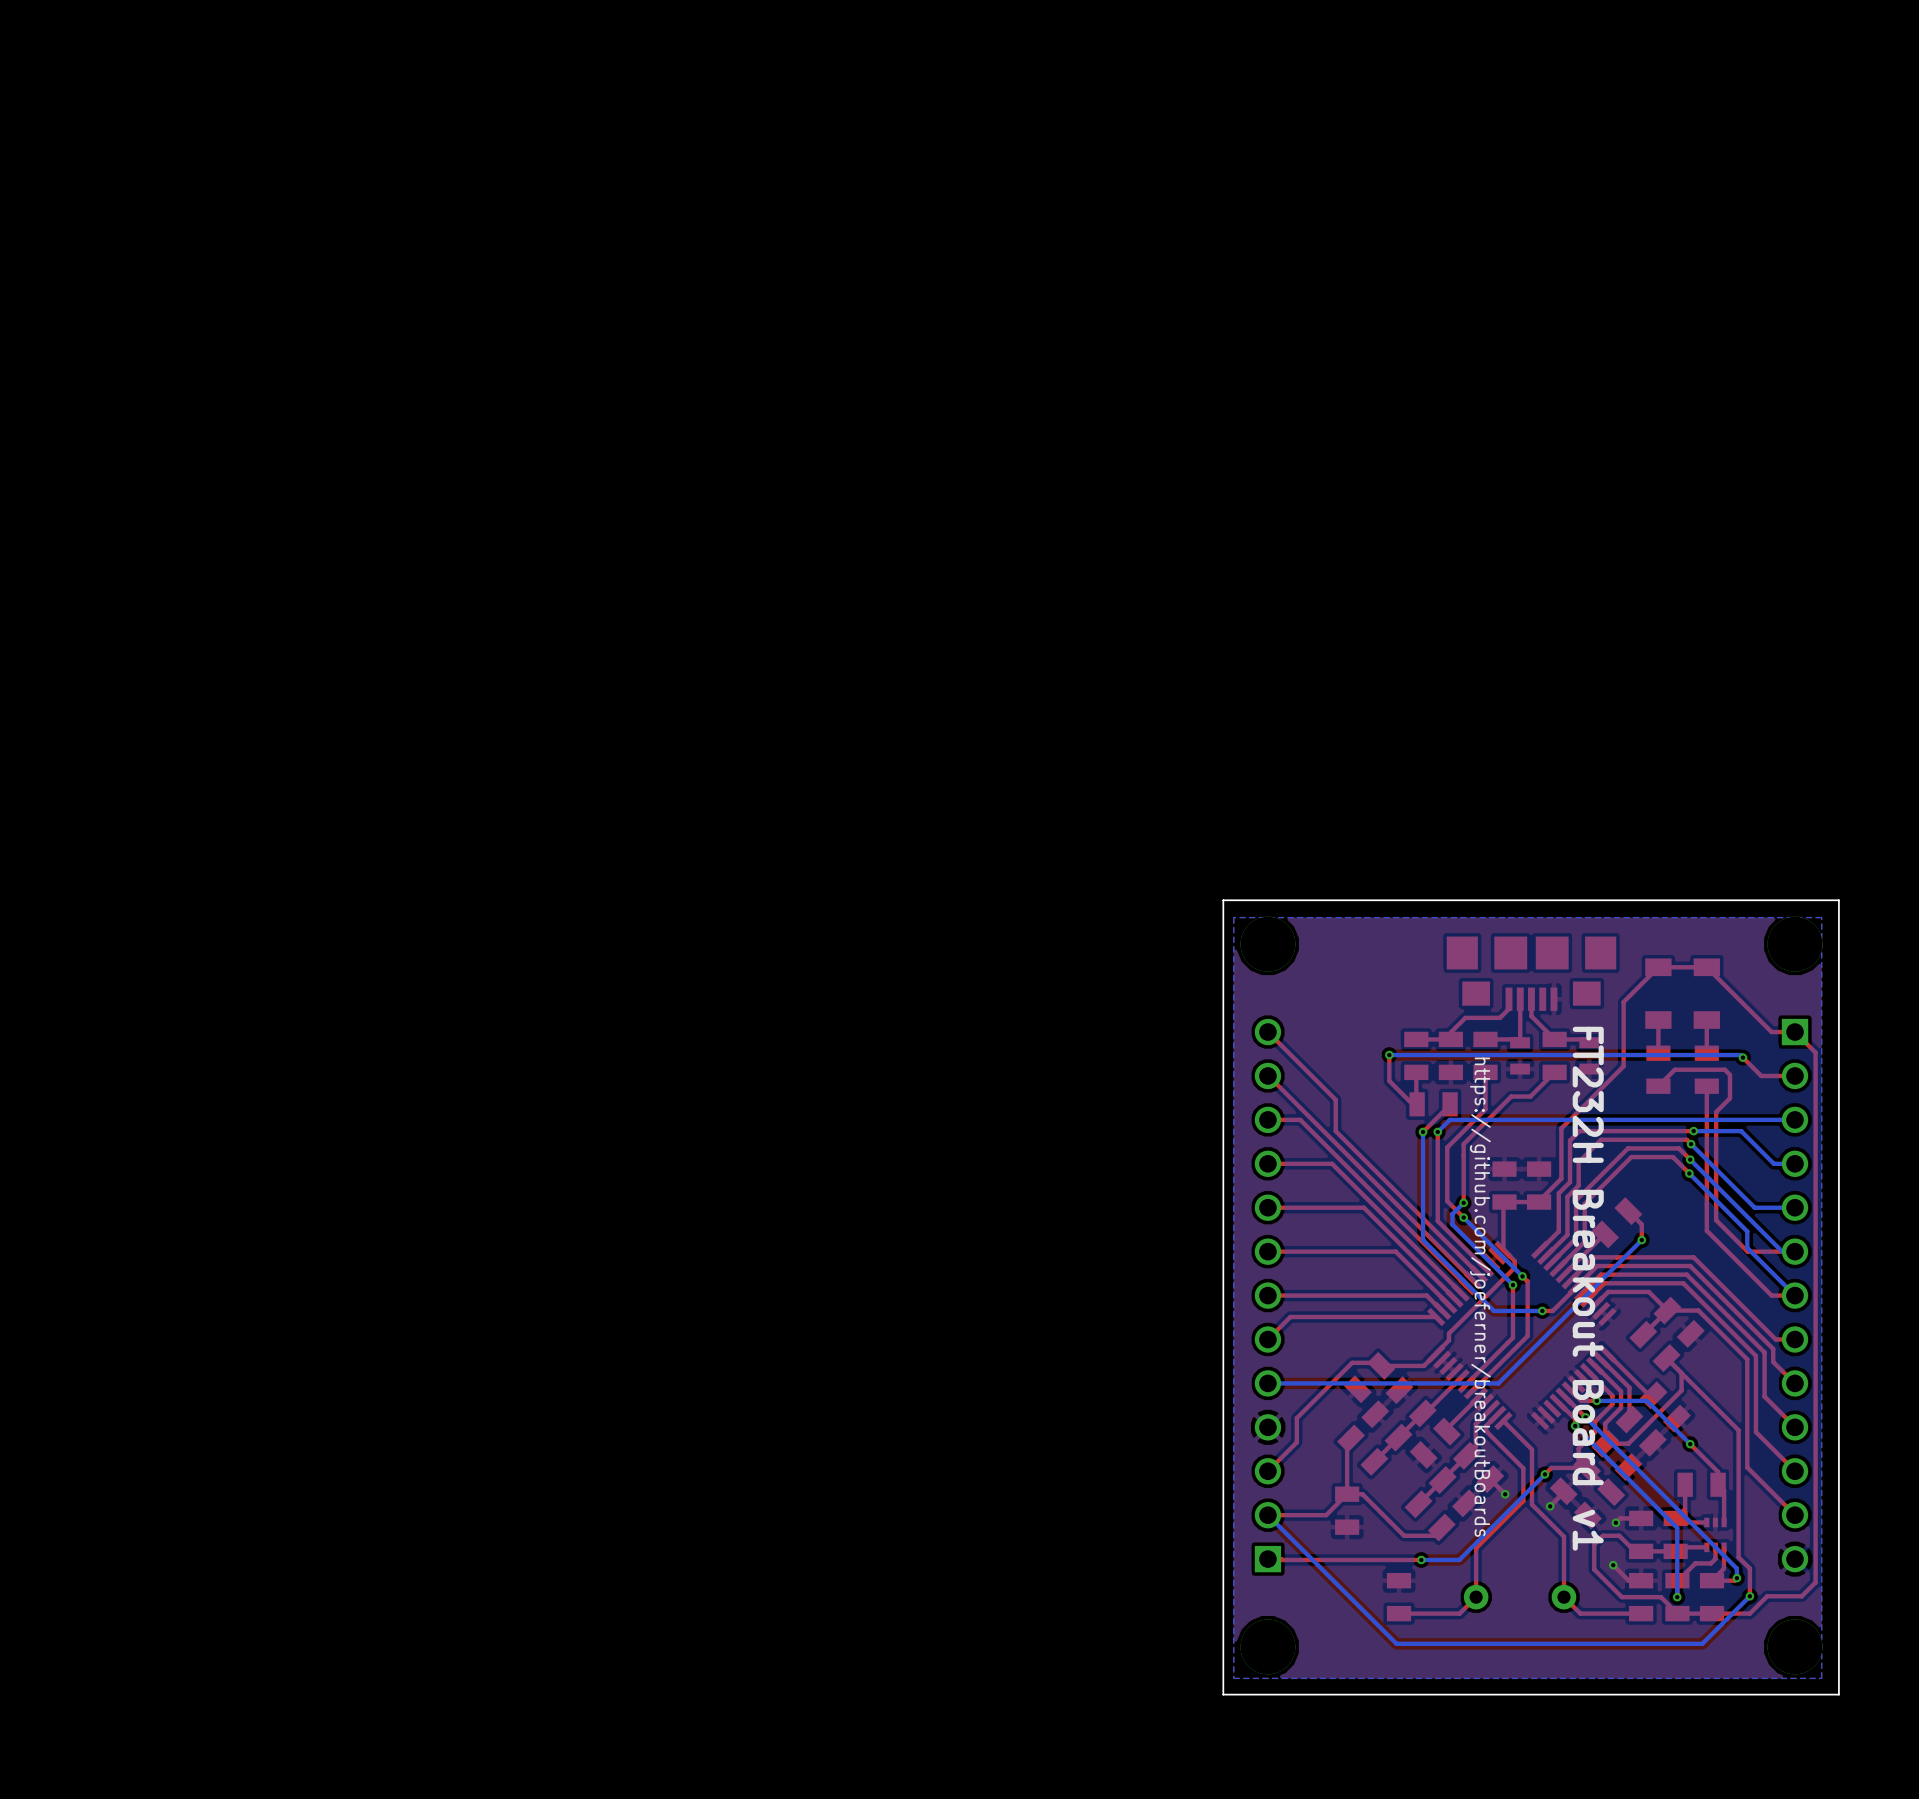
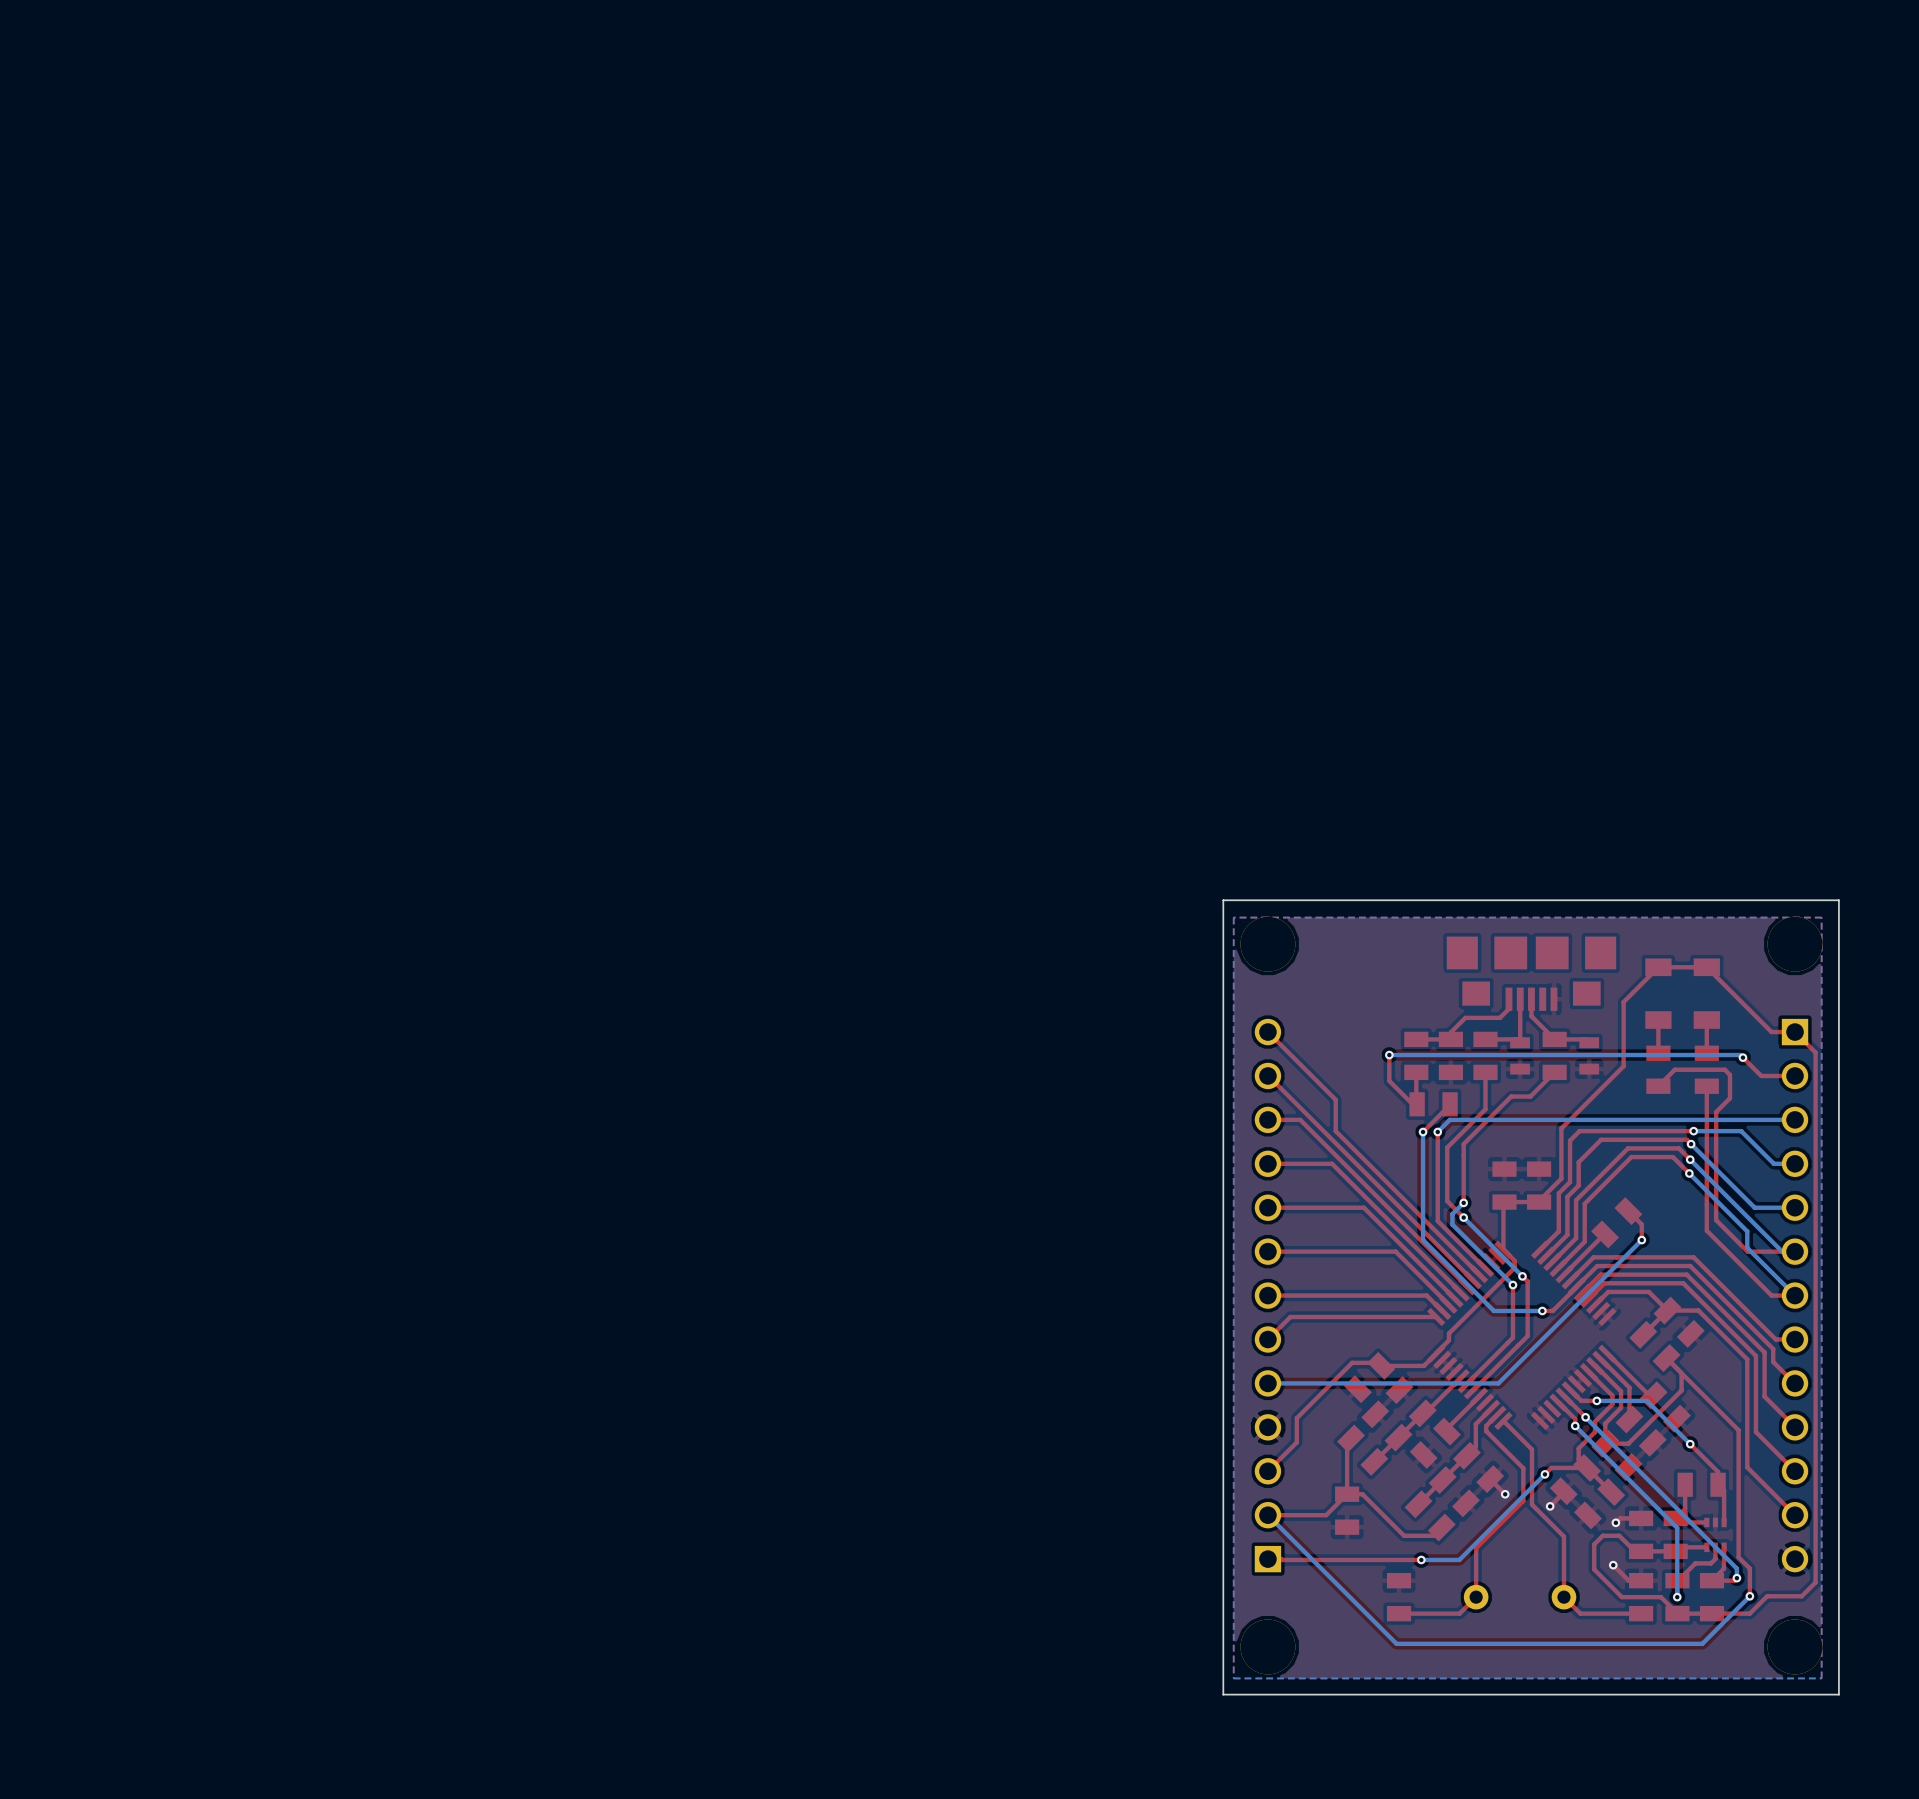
text: FT232H Breakout Board v1 (1588, 1288) -> none
text: https://github.com/joeferner/breakoutBoards (1480, 1297) -> none

